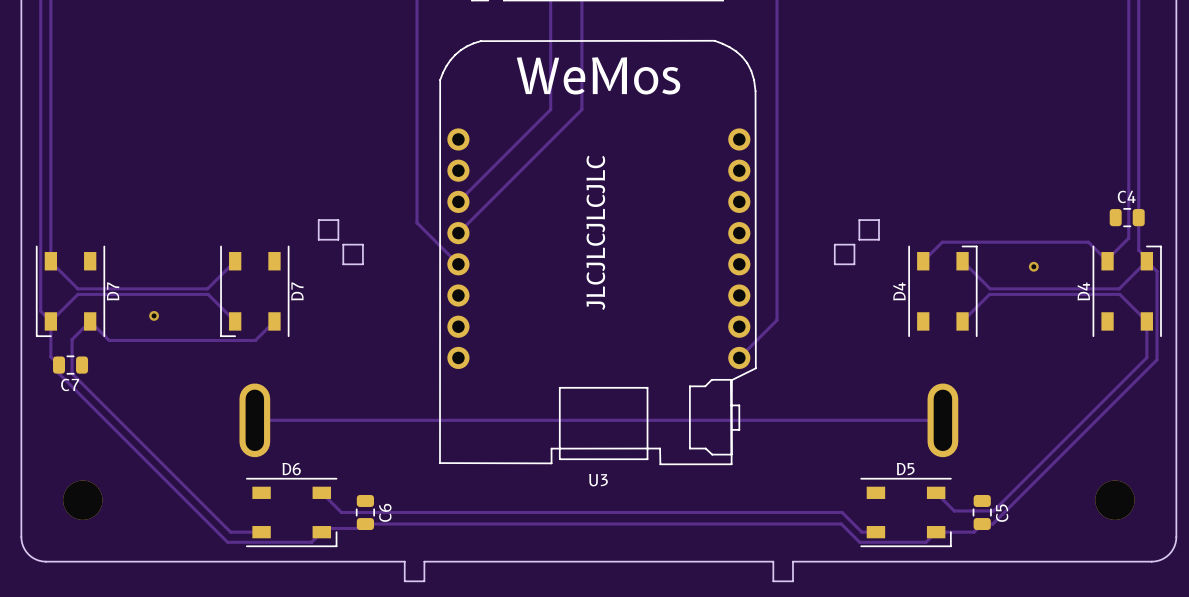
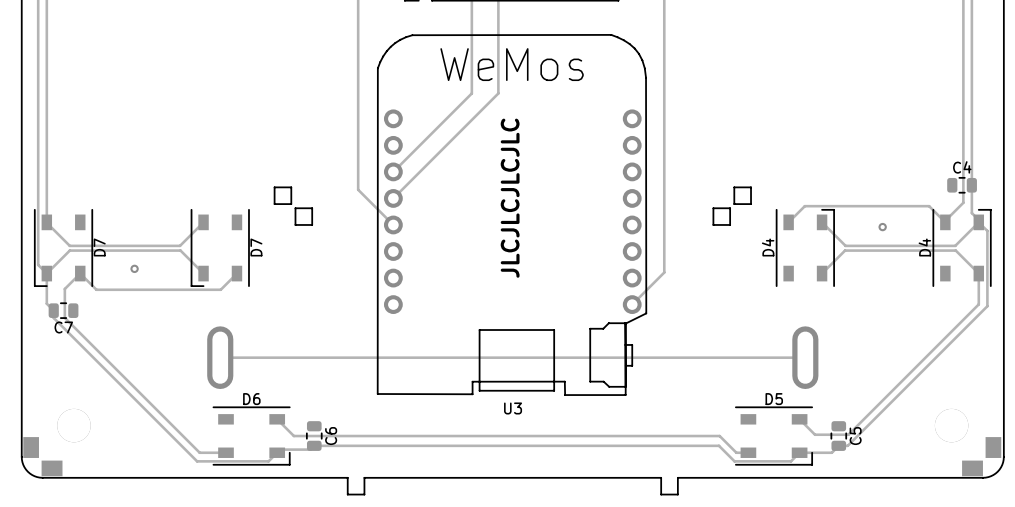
part: none -> (31, 447)
part: none -> (993, 447)
part: none -> (52, 468)
part: none -> (972, 468)

